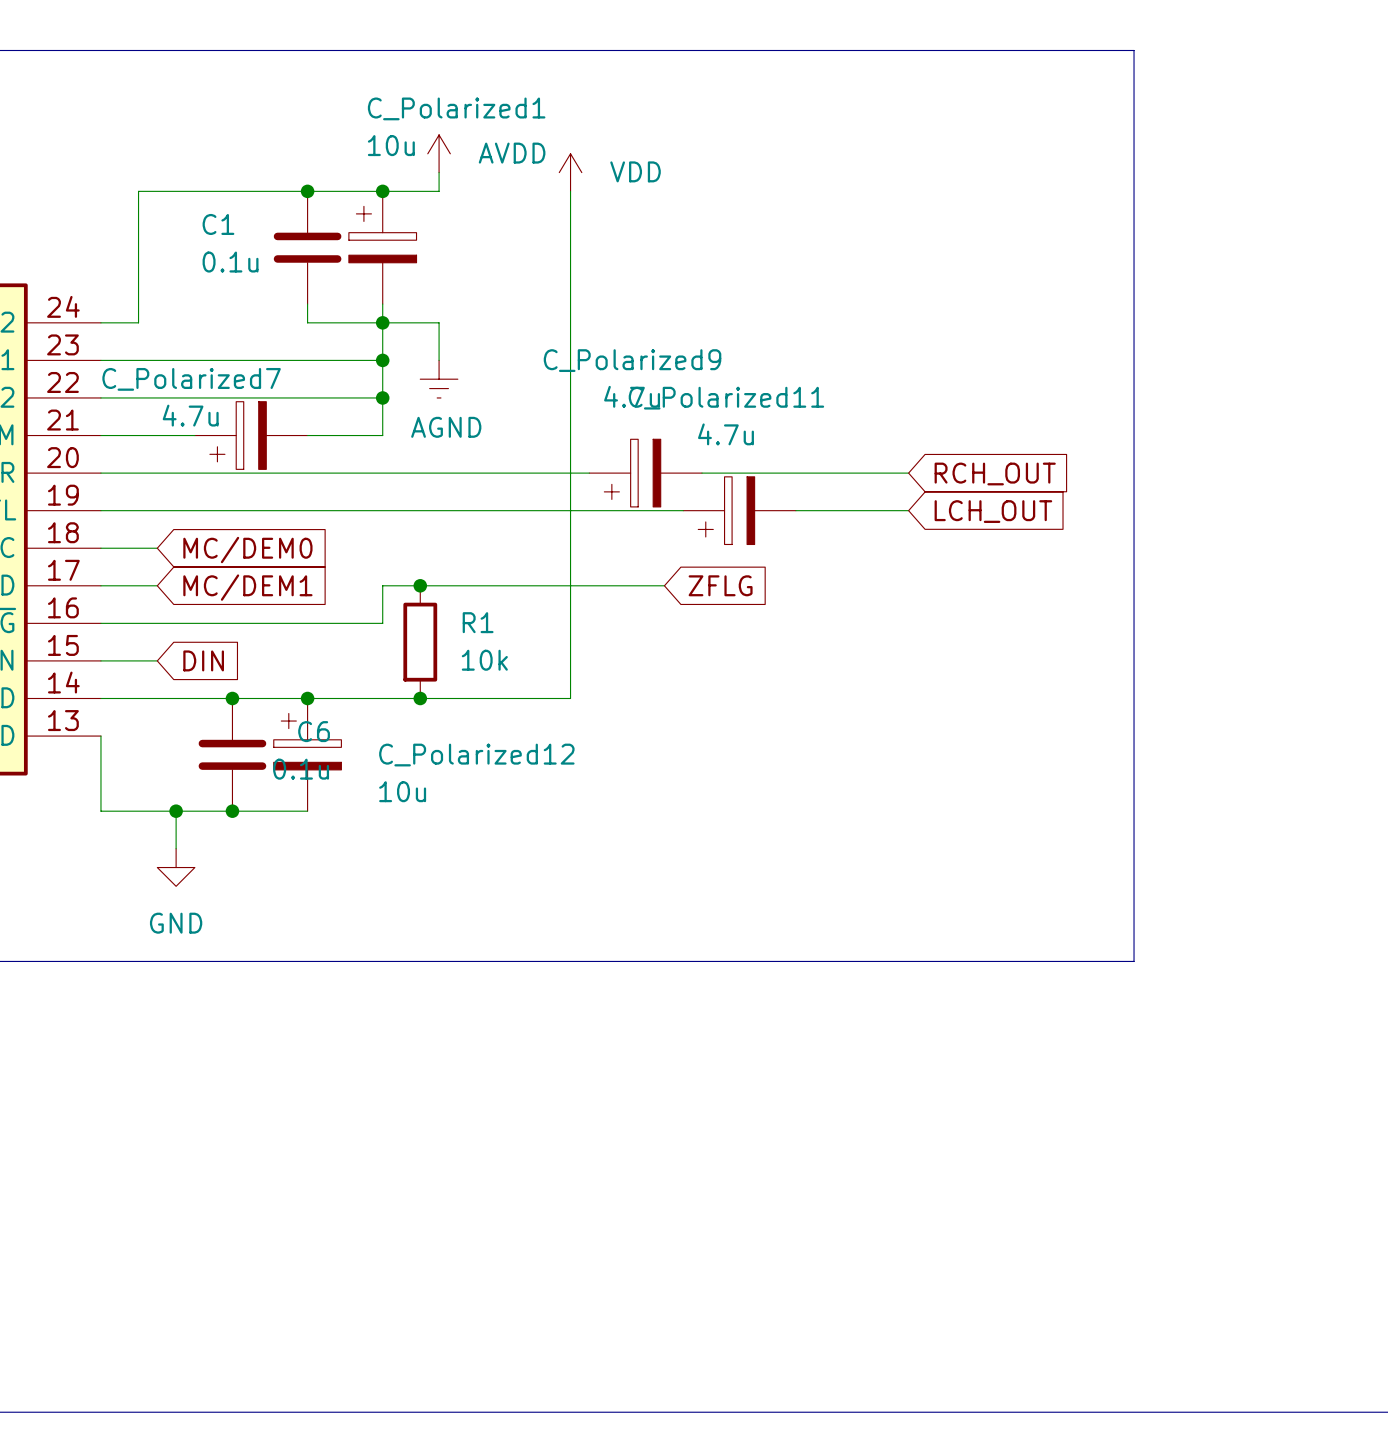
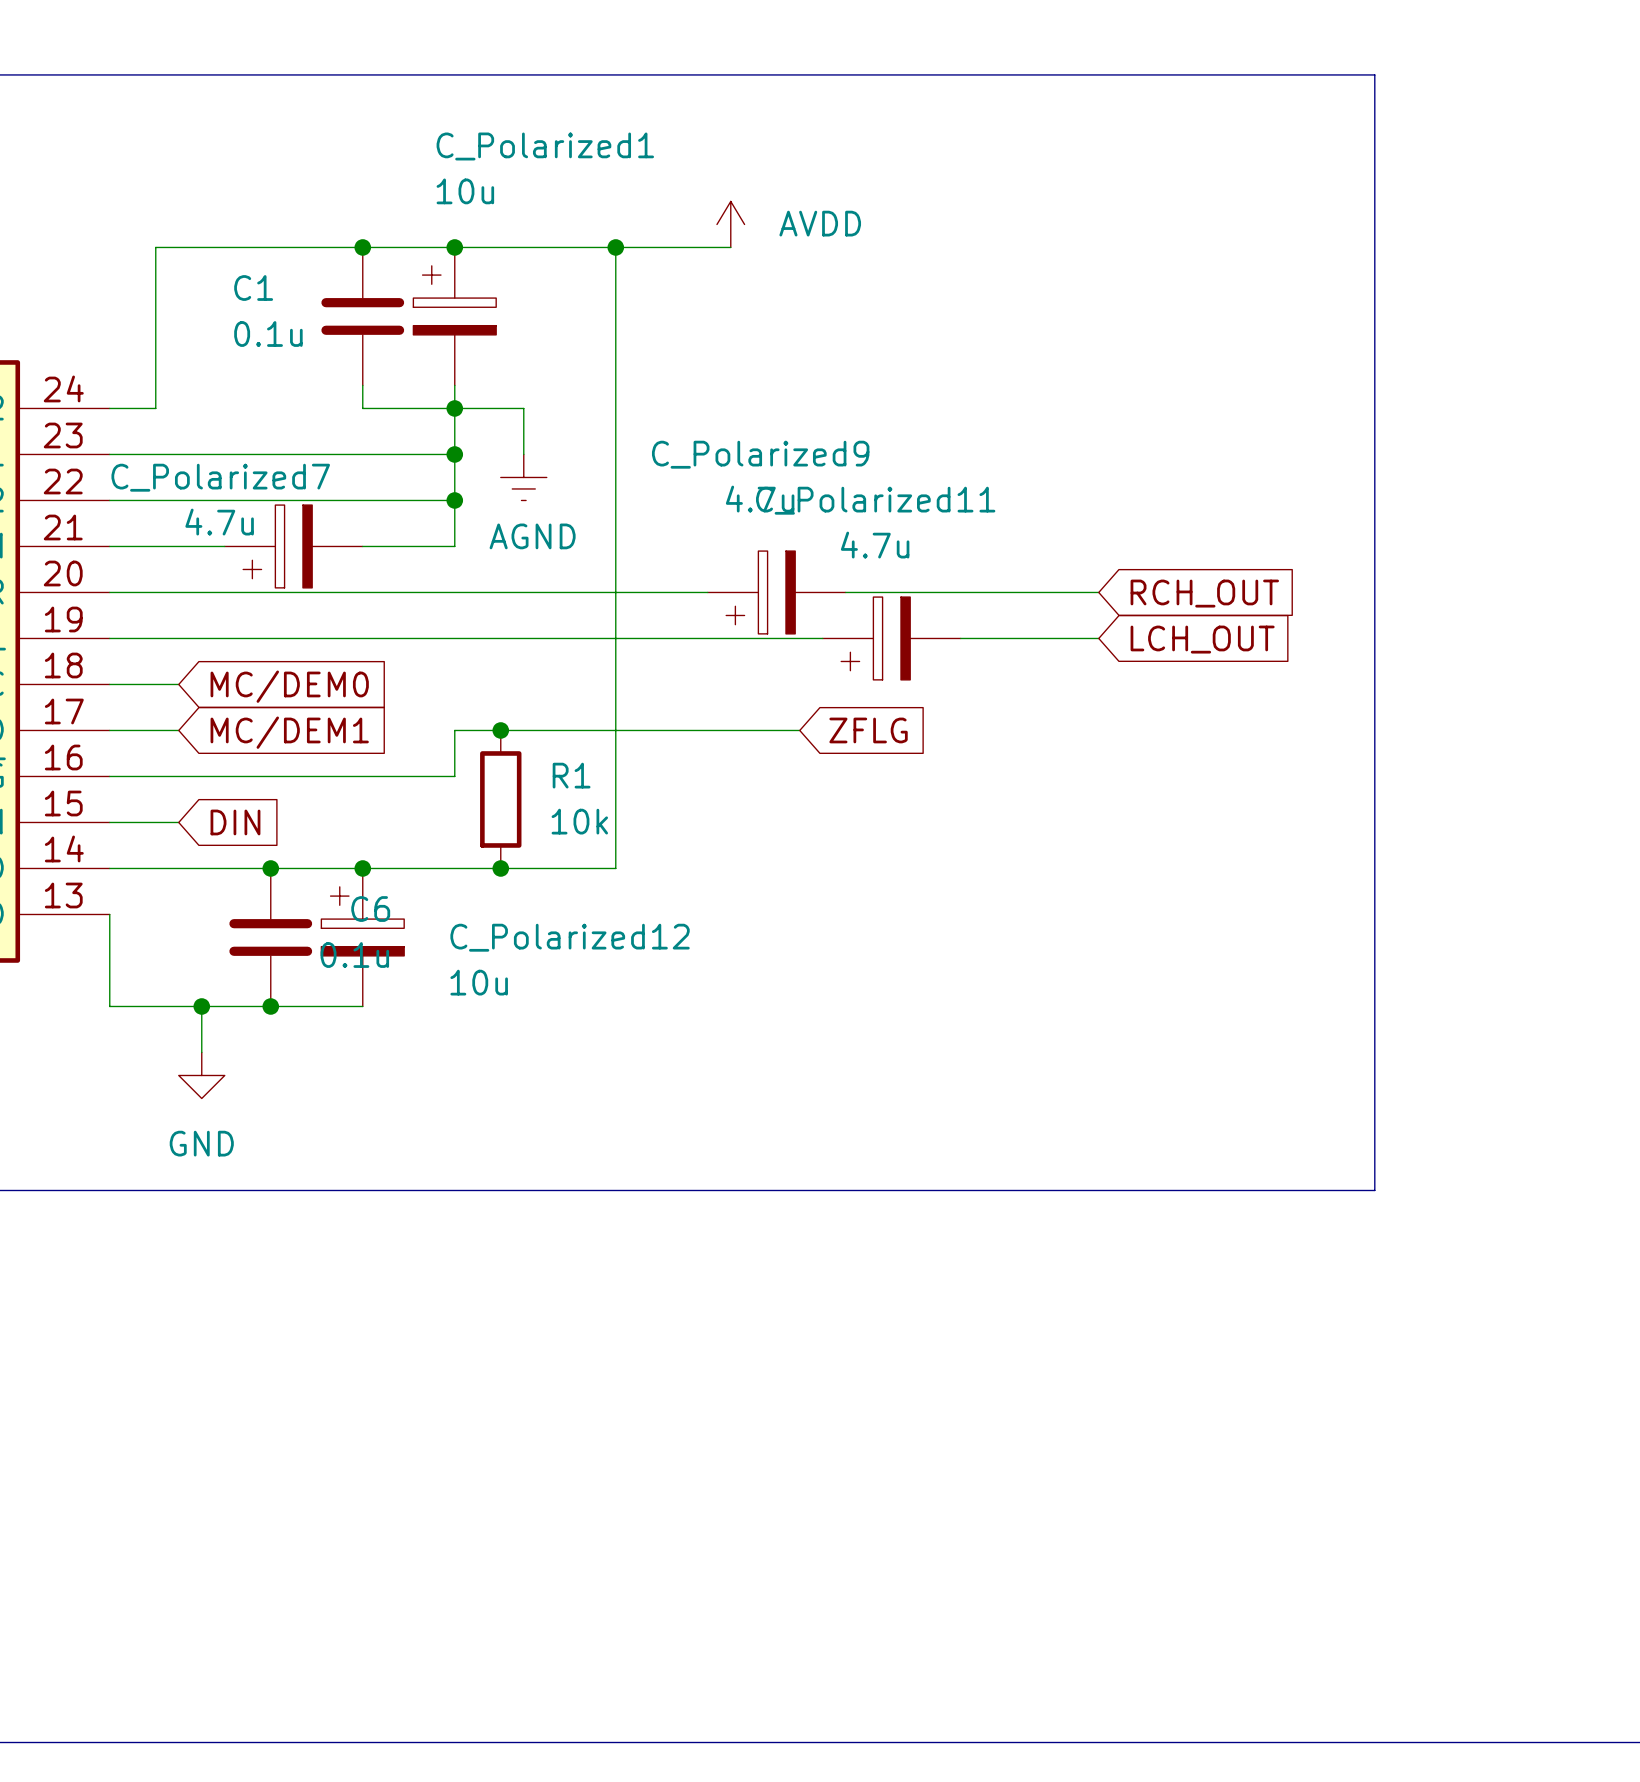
power symbol position: AVDD (439, 153) -> AVDD (730, 224)
wire: (439, 172) (439, 191) -> (730, 247) (523, 247)
power symbol: VDD (570, 172) -> none
junction: none -> (615, 247)
wire: (570, 191) (570, 698) (514, 698) -> (615, 247) (615, 868)

